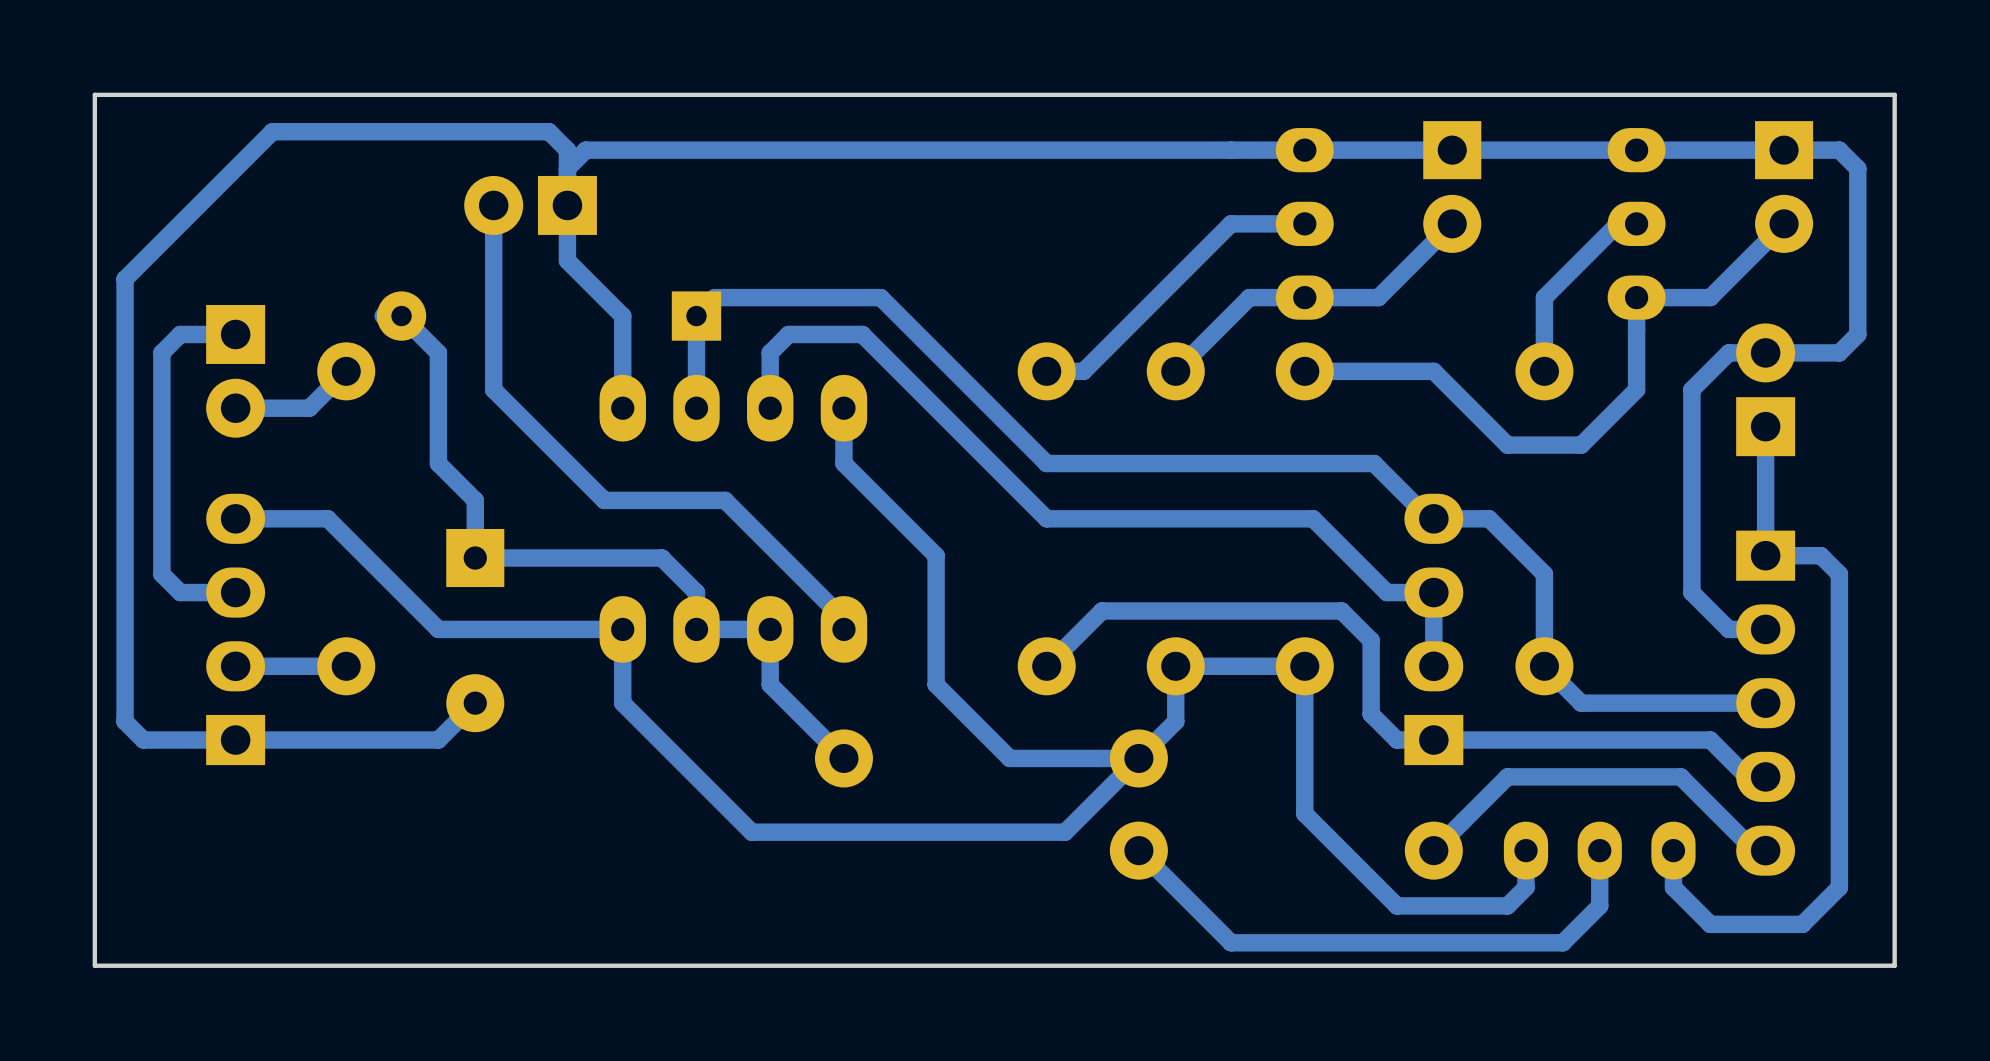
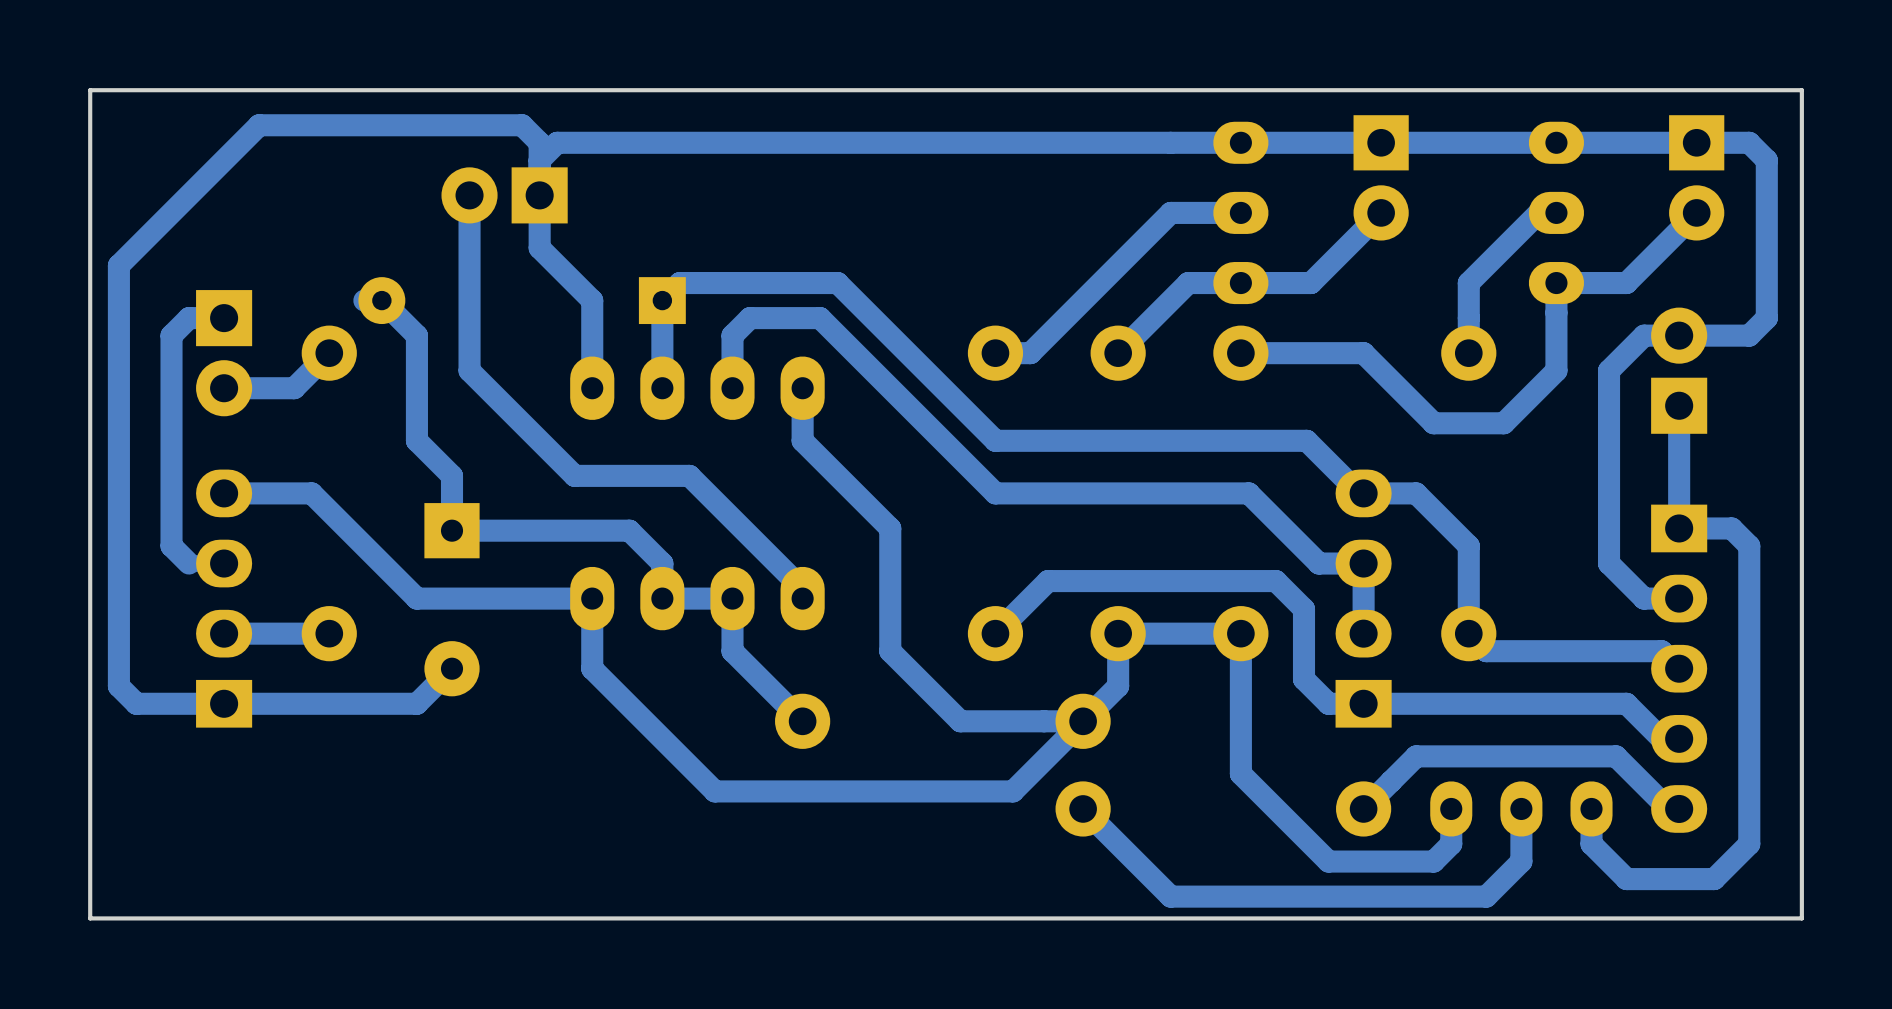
bottom track width: thin (567, 168) (585, 150) (1839, 150) (1857, 168) (1857, 334) (1839, 352) (1728, 352) (1691, 389) (1691, 592) (1728, 629) (1765, 629) -> thick (539, 160) (557, 142) (1749, 142) (1766, 160) (1766, 318) (1749, 335) (1644, 335) (1609, 370) (1609, 563) (1644, 598) (1679, 598)
bottom track width: thin (493, 205) (493, 389) (604, 500) (725, 500) (843, 619) (843, 629) -> thick (469, 195) (469, 370) (574, 475) (689, 475) (802, 588) (802, 598)
bottom track width: thin (1304, 223) (1231, 223) (1083, 371) (1046, 371) -> thick (1240, 212) (1170, 212) (1030, 353) (995, 353)
bottom track width: thin (1452, 223) (1378, 297) (1249, 297) (1175, 371) -> thick (1381, 212) (1311, 283) (1188, 283) (1118, 353)
bottom track width: thin (1636, 223) (1618, 223) (1544, 297) (1544, 371) -> thick (1556, 212) (1538, 212) (1468, 283) (1468, 353)
bottom track width: thin (1784, 223) (1710, 297) (1636, 297) (1636, 389) (1581, 445) (1507, 445) (1433, 371) (1304, 371) -> thick (1696, 212) (1626, 283) (1556, 283) (1556, 370) (1503, 423) (1433, 423) (1363, 353) (1240, 353)
bottom track width: thin (383, 316) (401, 316) (438, 352) (438, 463) (475, 500) (475, 558) (661, 558) (696, 592) (696, 629) (770, 629) (770, 684) (843, 758) -> thick (364, 300) (381, 300) (416, 335) (416, 440) (452, 475) (452, 530) (629, 530) (662, 563) (662, 598) (732, 598) (732, 651) (802, 721)
bottom track: (198, 334) (180, 334) (161, 352) (161, 574) (180, 592) (198, 592) -> (189, 318) (171, 335) (171, 546) (189, 563)
bottom track width: thin (346, 371) (309, 408) (235, 408) -> thick (329, 353) (294, 388) (224, 388)
bottom track width: thin (622, 408) (622, 316) (567, 260) (567, 150) (549, 131) (272, 131) (125, 279) (125, 721) (143, 740) (438, 740) (475, 703) -> thick (592, 388) (592, 300) (539, 247) (539, 142) (522, 125) (259, 125) (118, 265) (118, 686) (136, 703) (416, 703) (452, 668)
bottom track width: thin (696, 408) (696, 316) (714, 297) (880, 297) (1046, 463) (1374, 463) (1429, 518) (1489, 518) (1544, 574) (1544, 666) (1562, 684) -> thick (662, 388) (662, 300) (679, 283) (837, 283) (995, 440) (1306, 440) (1359, 493) (1416, 493) (1468, 546) (1468, 633) (1486, 651)
bottom track width: thin (770, 408) (770, 352) (788, 334) (862, 334) (1046, 518) (1313, 518) (1386, 592) (1433, 592) (1433, 666) -> thick (732, 388) (732, 335) (750, 318) (820, 318) (995, 493) (1248, 493) (1318, 563) (1363, 563) (1363, 633)
bottom track width: thin (843, 408) (843, 463) (936, 555) (936, 684) (1009, 758) (1138, 758) -> thick (802, 388) (802, 440) (890, 528) (890, 651) (960, 721) (1083, 721)
bottom track width: thin (1765, 426) (1765, 555) (1820, 555) (1839, 574) (1839, 887) (1802, 924) (1710, 924) (1673, 887) (1673, 850) -> thick (1679, 405) (1679, 528) (1731, 528) (1749, 546) (1749, 844) (1714, 879) (1626, 879) (1591, 844) (1591, 808)
bottom track width: thin (235, 518) (327, 518) (438, 629) (622, 629) (622, 703) (751, 832) (1065, 832) (1175, 721) (1175, 666) (1304, 666) (1304, 813) (1396, 905) (1507, 905) (1525, 887) (1525, 850) -> thick (224, 493) (311, 493) (416, 598) (592, 598) (592, 668) (714, 791) (1012, 791) (1118, 686) (1118, 633) (1240, 633) (1240, 773) (1328, 861) (1433, 861) (1451, 844) (1451, 808)
bottom track width: thin (346, 666) (235, 666) -> thick (329, 633) (224, 633)
bottom track width: thin (1046, 666) (1102, 610) (1341, 610) (1371, 640) (1371, 714) (1396, 740) (1710, 740) (1747, 776) (1765, 776) -> thick (995, 633) (1048, 581) (1275, 581) (1304, 609) (1304, 679) (1328, 703) (1626, 703) (1661, 738) (1679, 738)
bottom track: (1562, 684) (1581, 703) (1765, 703) -> (1486, 651) (1661, 651) (1679, 668)
bottom track width: thin (1489, 795) (1433, 850) -> thick (1416, 756) (1363, 808)
bottom track: (1699, 795) (1680, 776) (1507, 776) (1489, 795) -> (1616, 756) (1416, 756)
bottom track width: thin (1699, 795) (1754, 850) (1765, 850) -> thick (1616, 756) (1668, 808) (1679, 808)
bottom track width: thin (1599, 850) (1599, 905) (1562, 942) (1231, 942) (1138, 850) -> thick (1521, 808) (1521, 861) (1486, 896) (1170, 896) (1083, 808)

